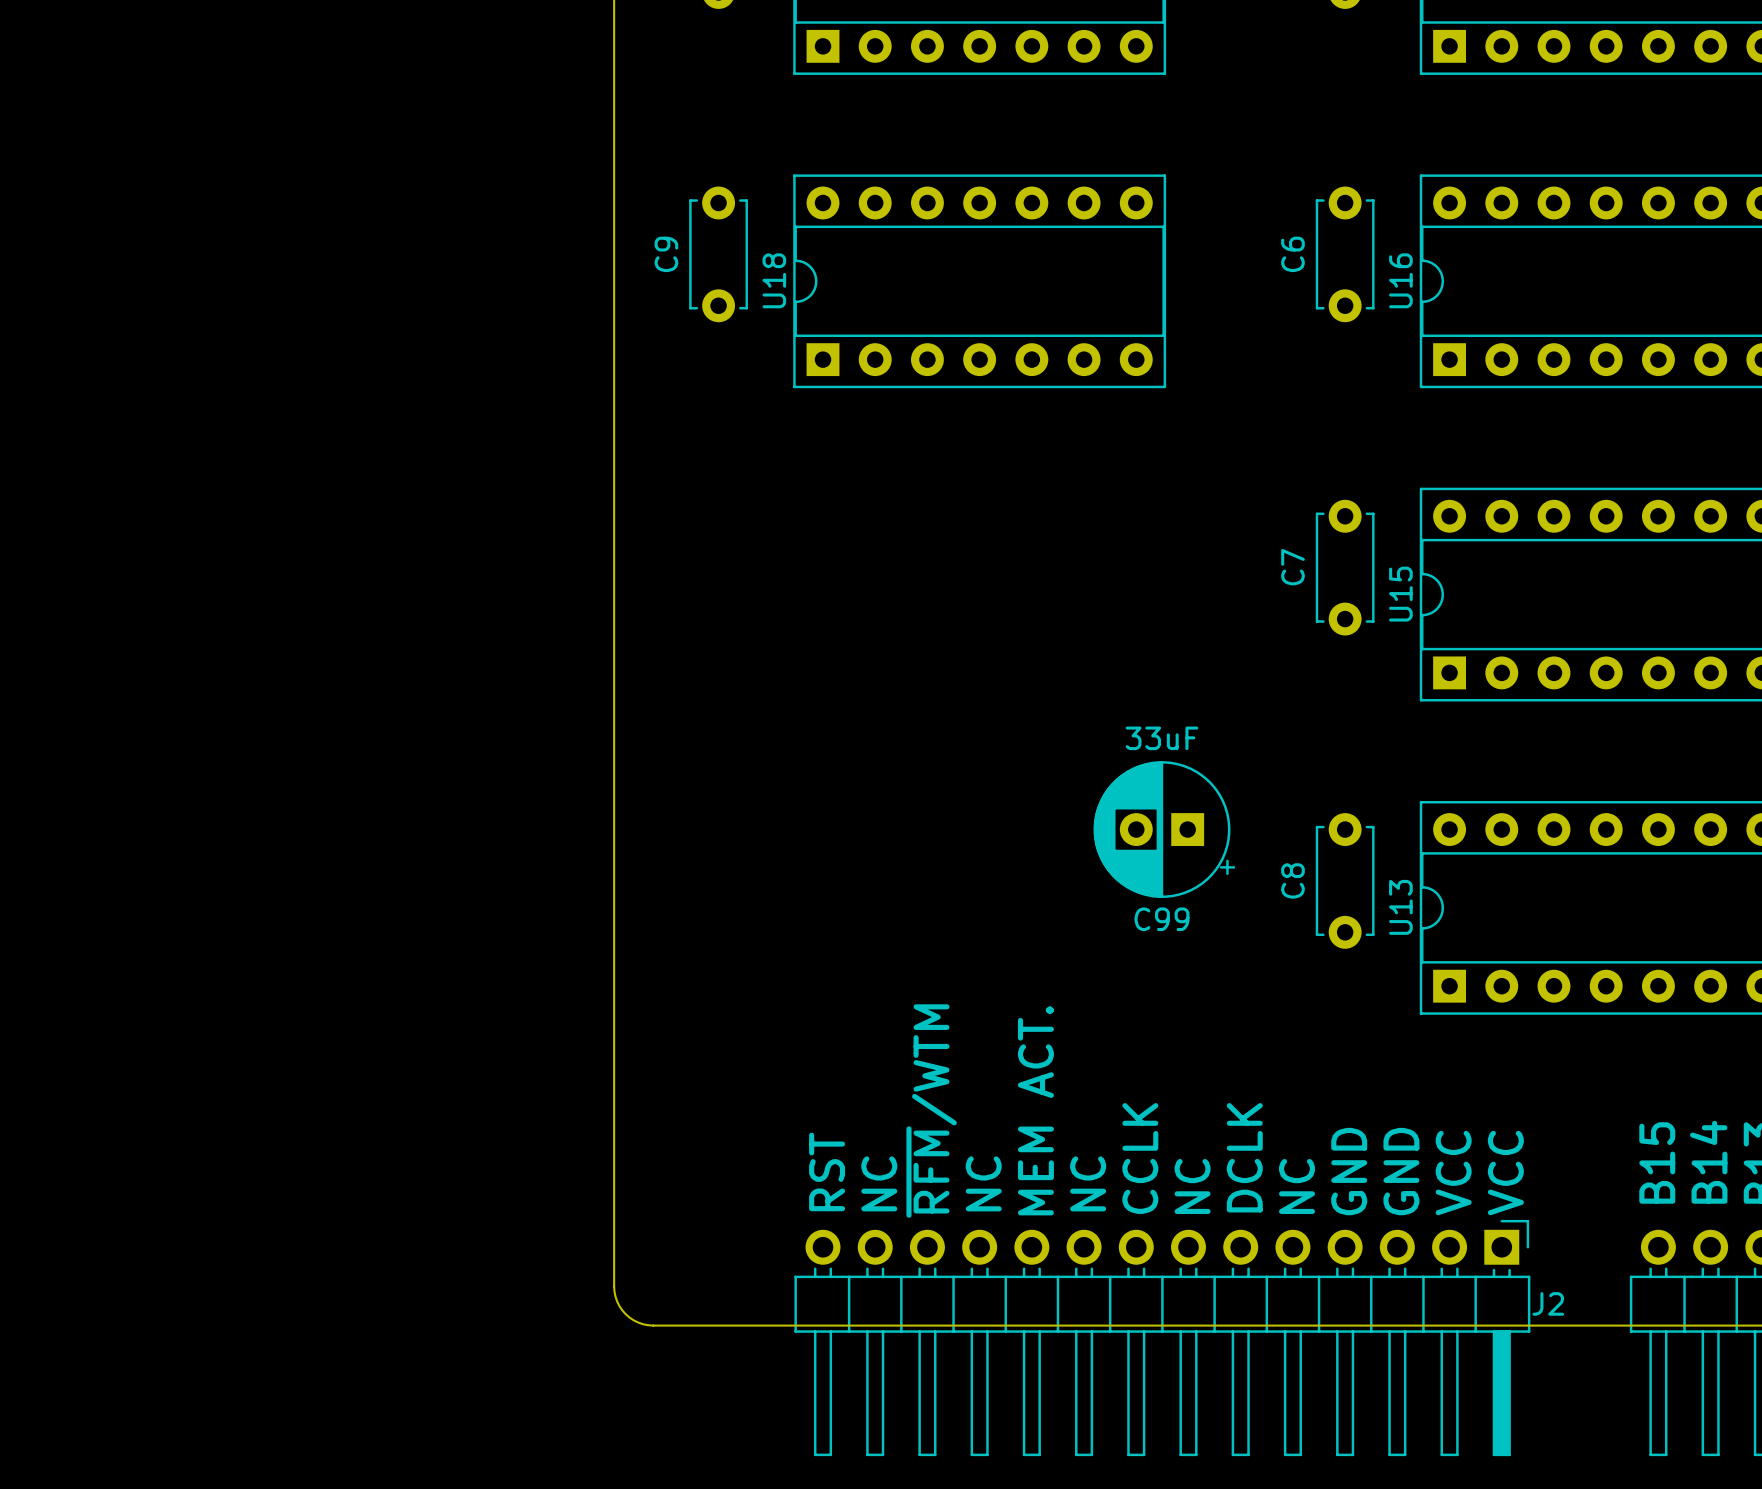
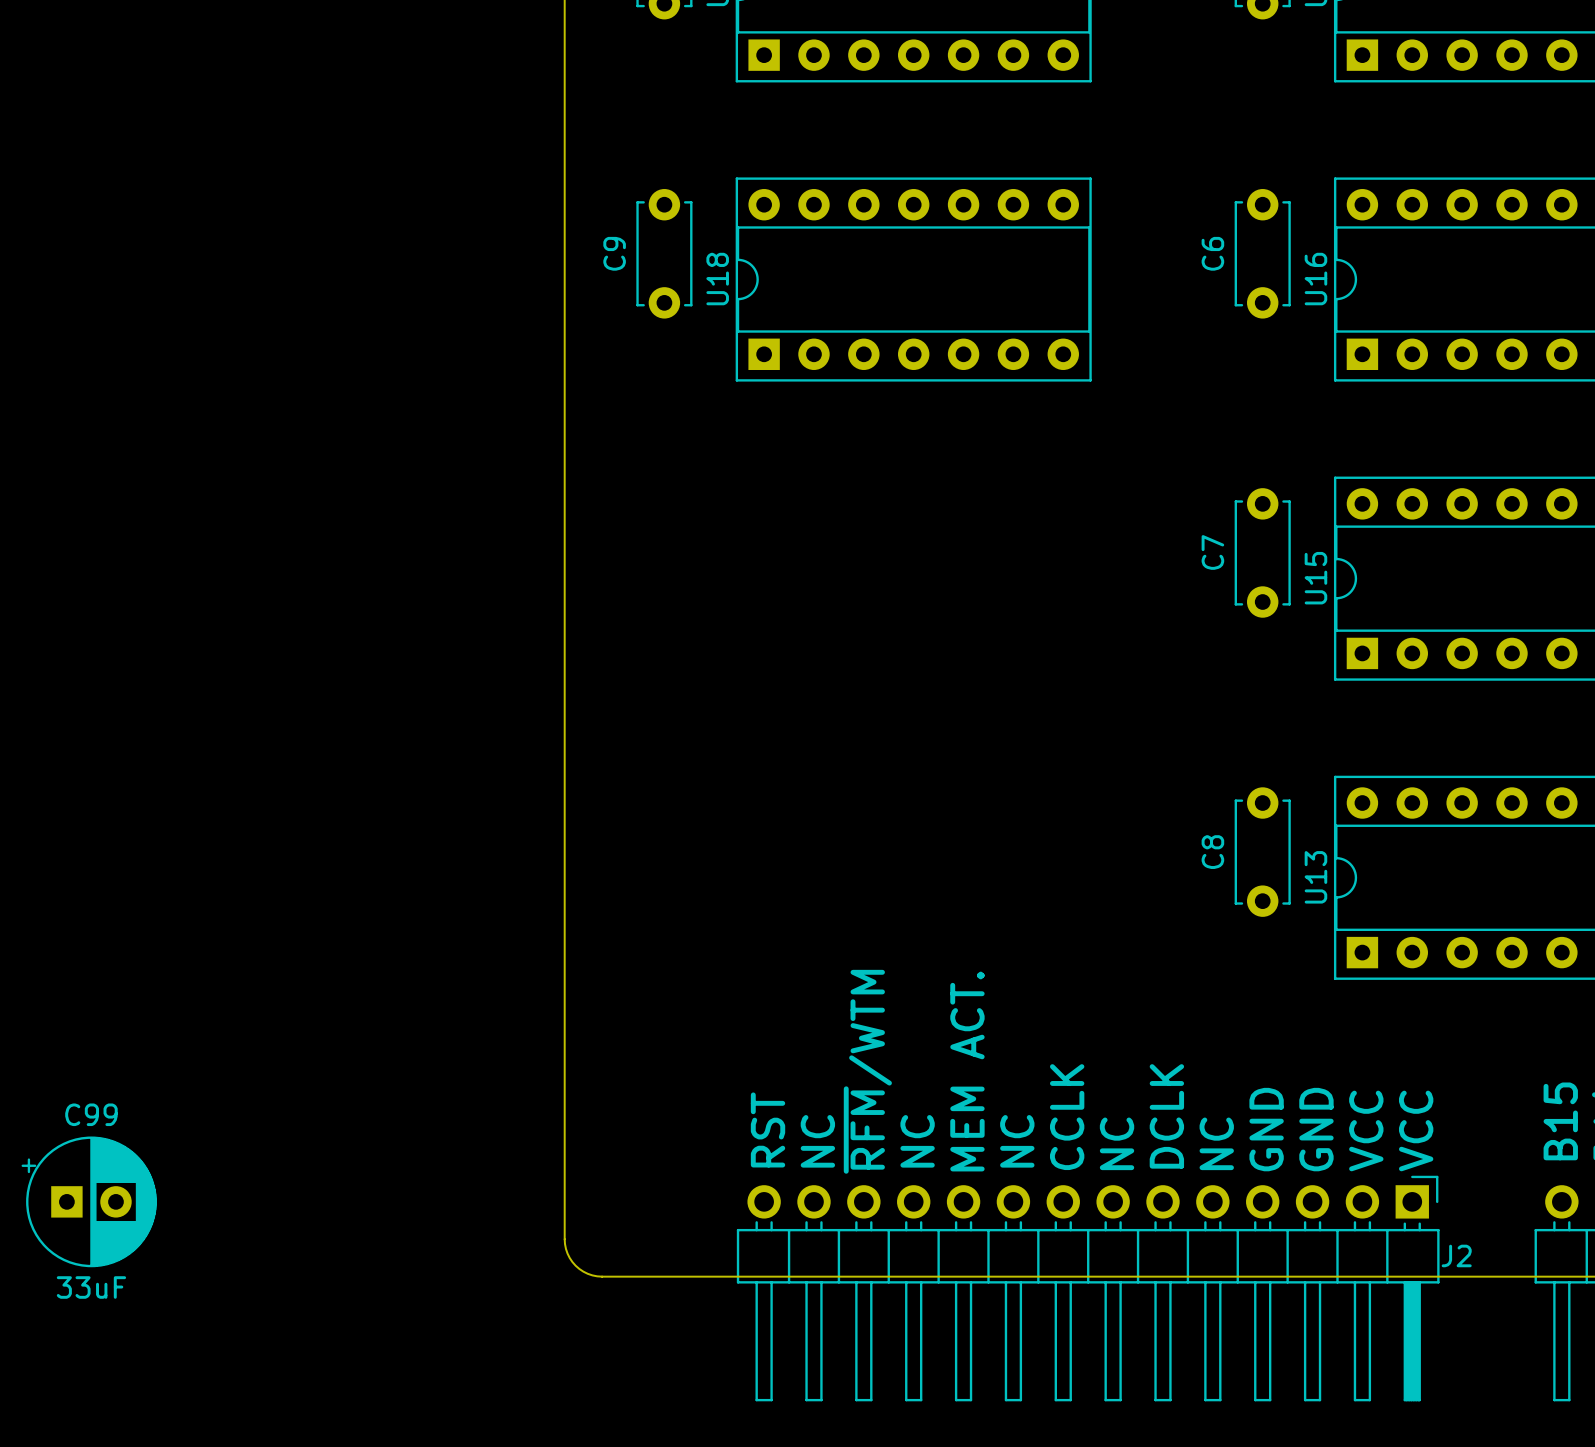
C99 rotation: 0° (1164, 829) -> 180° (89, 1201)
C99 position: (1164, 829) -> (89, 1201)

